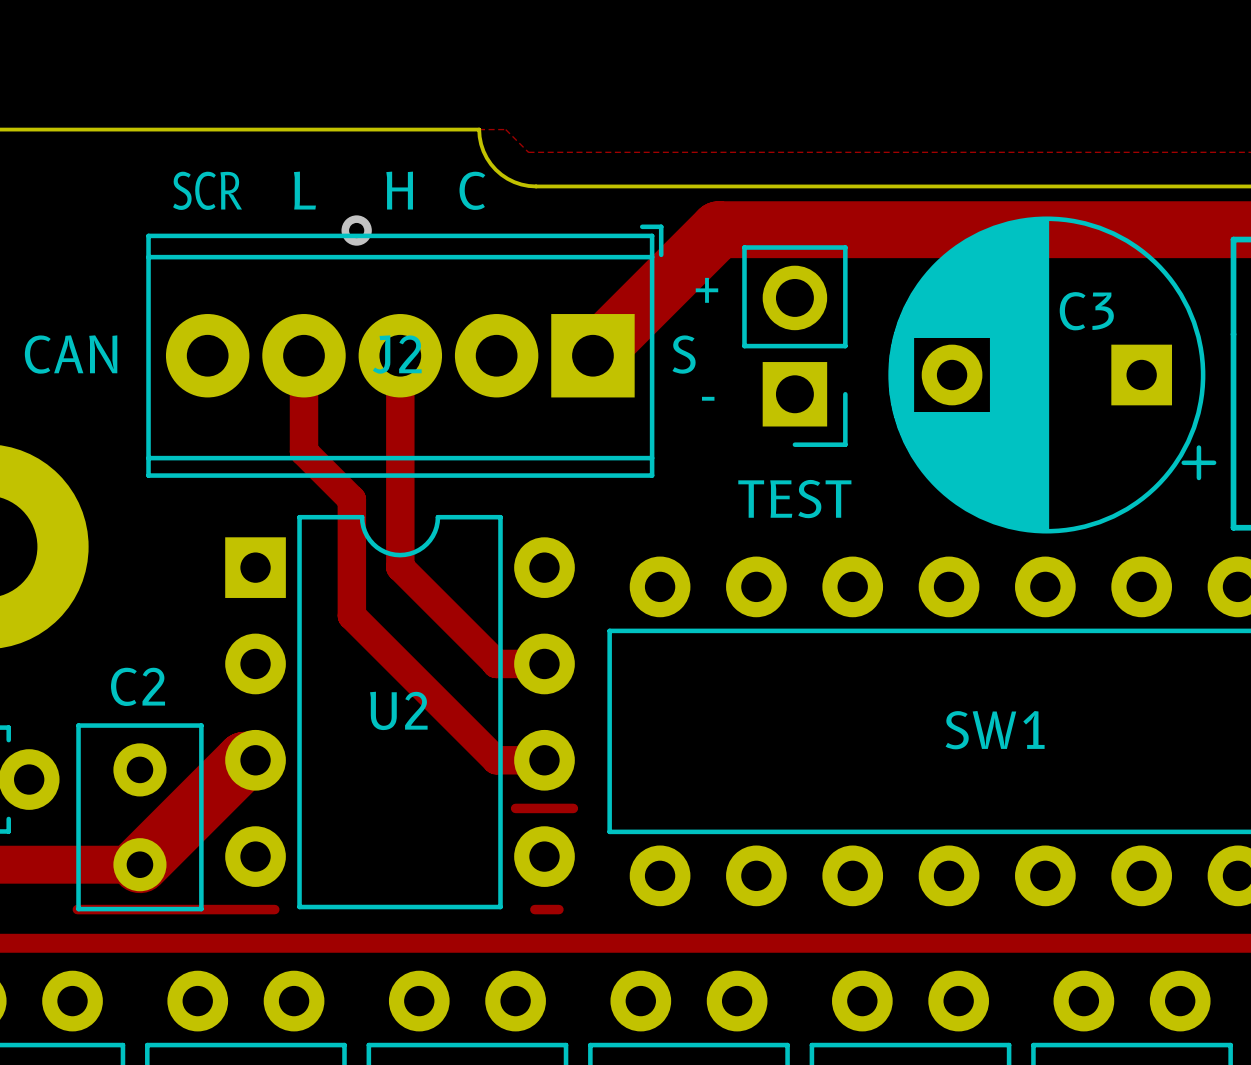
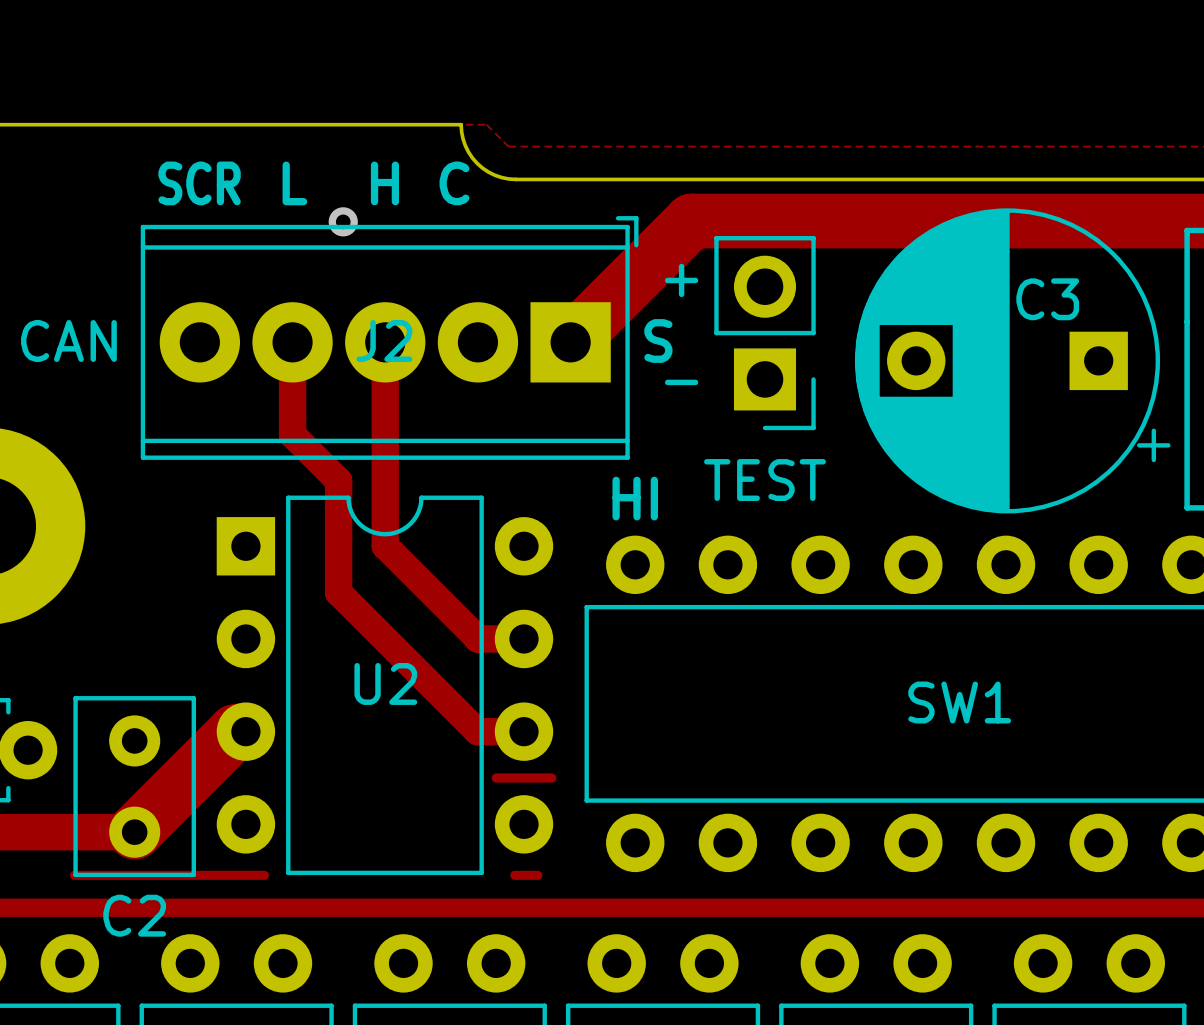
text: none -> HI (635, 498)
C2 name position: C2 (138, 686) -> C2 (134, 915)

